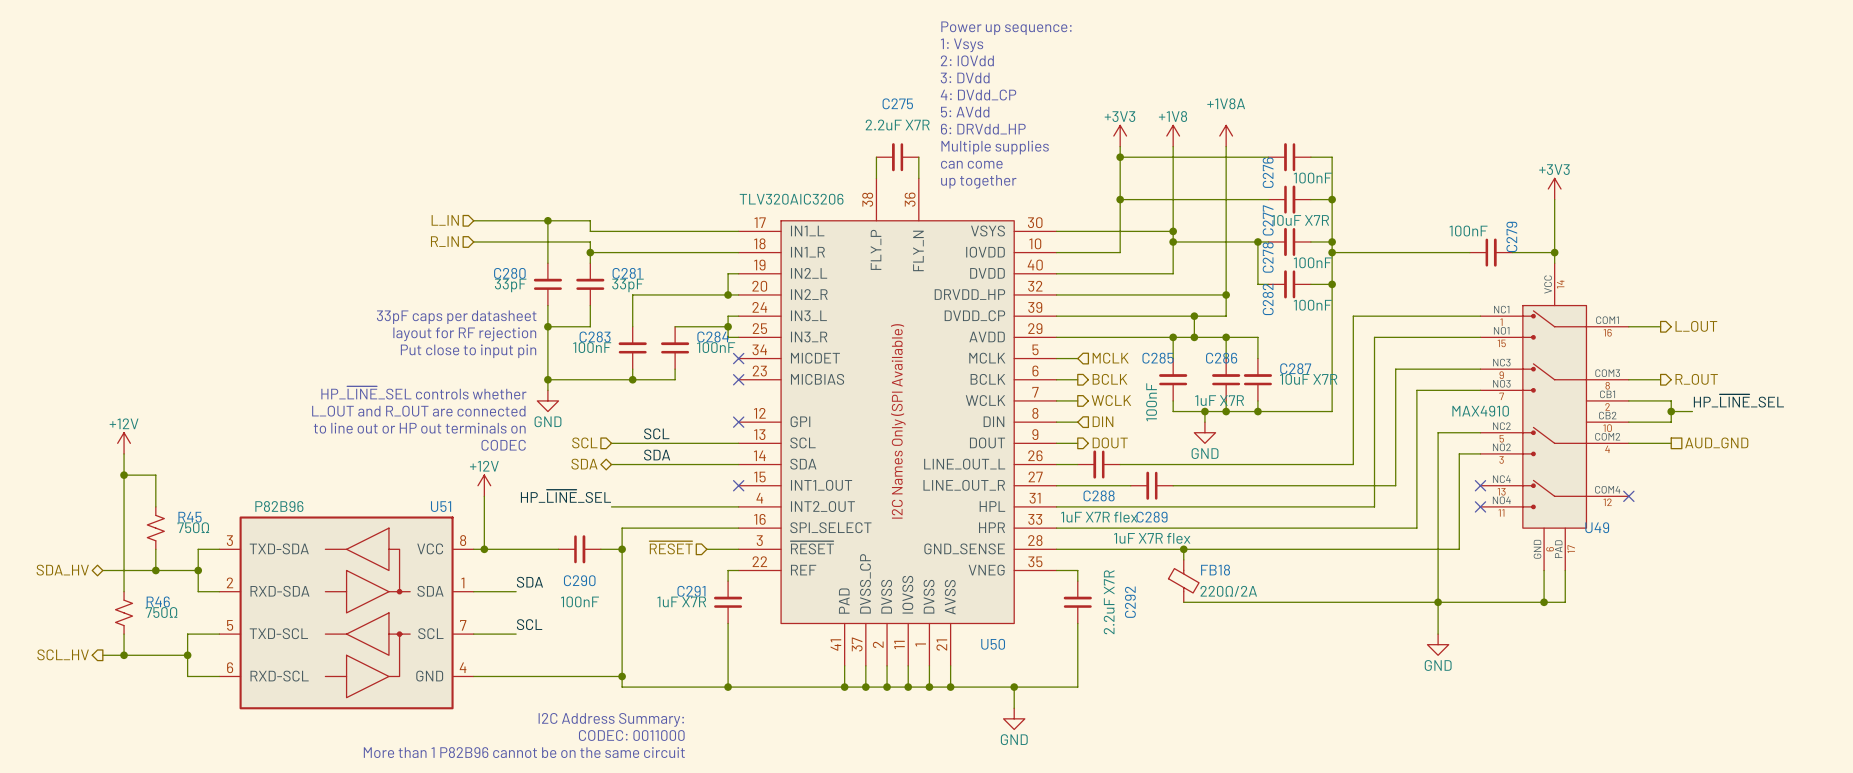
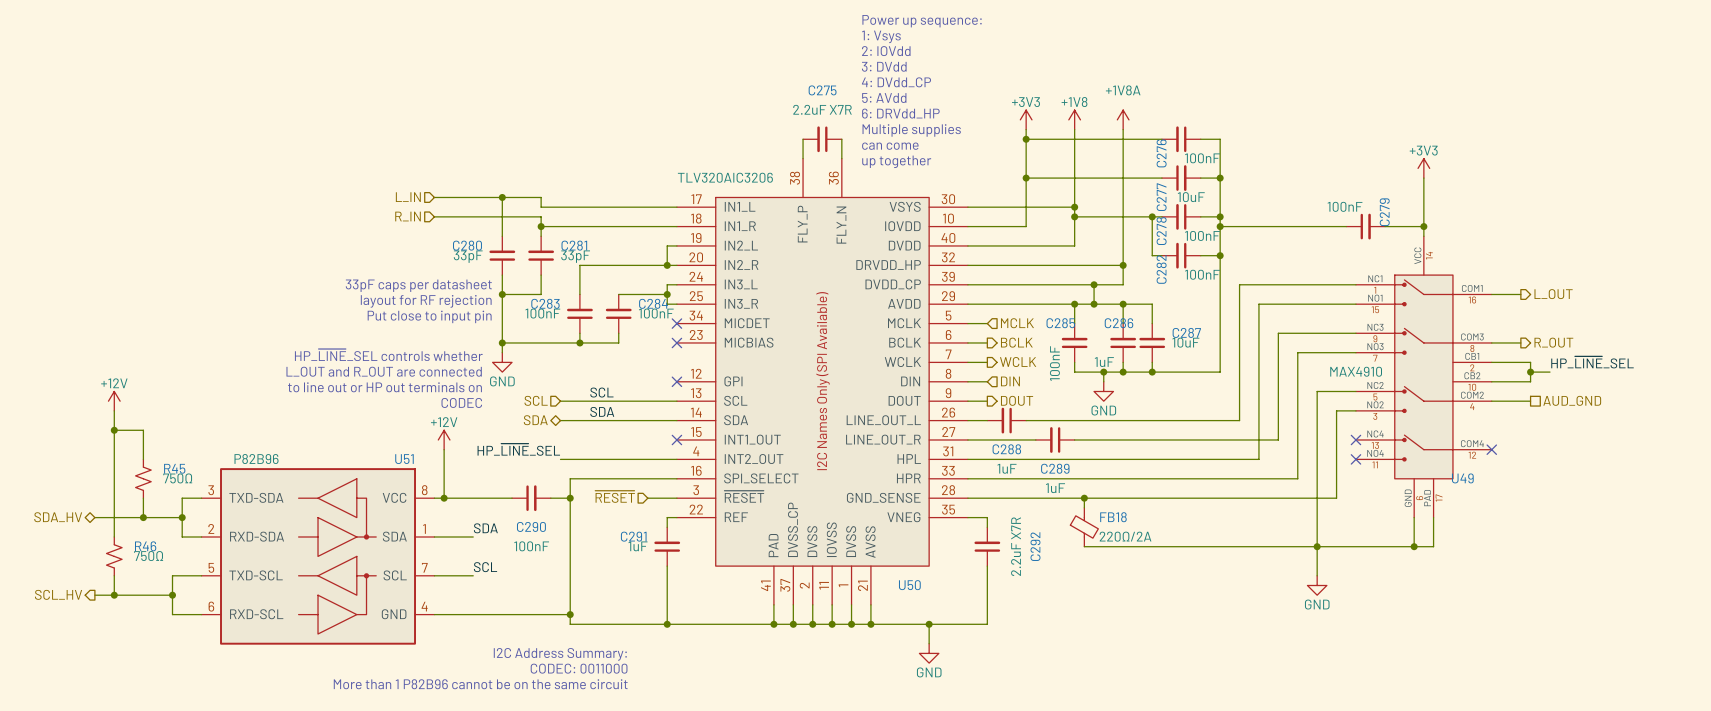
C277 value: 10uF X7R (1300, 220) -> 10uF (1191, 197)
C287 value: 10uF X7R (1308, 379) -> 10uF (1185, 342)
C286 value: 1uF X7R (1219, 400) -> 1uF (1104, 362)
C288 value: 1uF X7R flex (1099, 517) -> 1uF (1006, 468)
C289 value: 1uF X7R flex (1152, 538) -> 1uF (1055, 488)
C291 value: 1uF X7R (681, 601) -> 1uF (638, 546)

